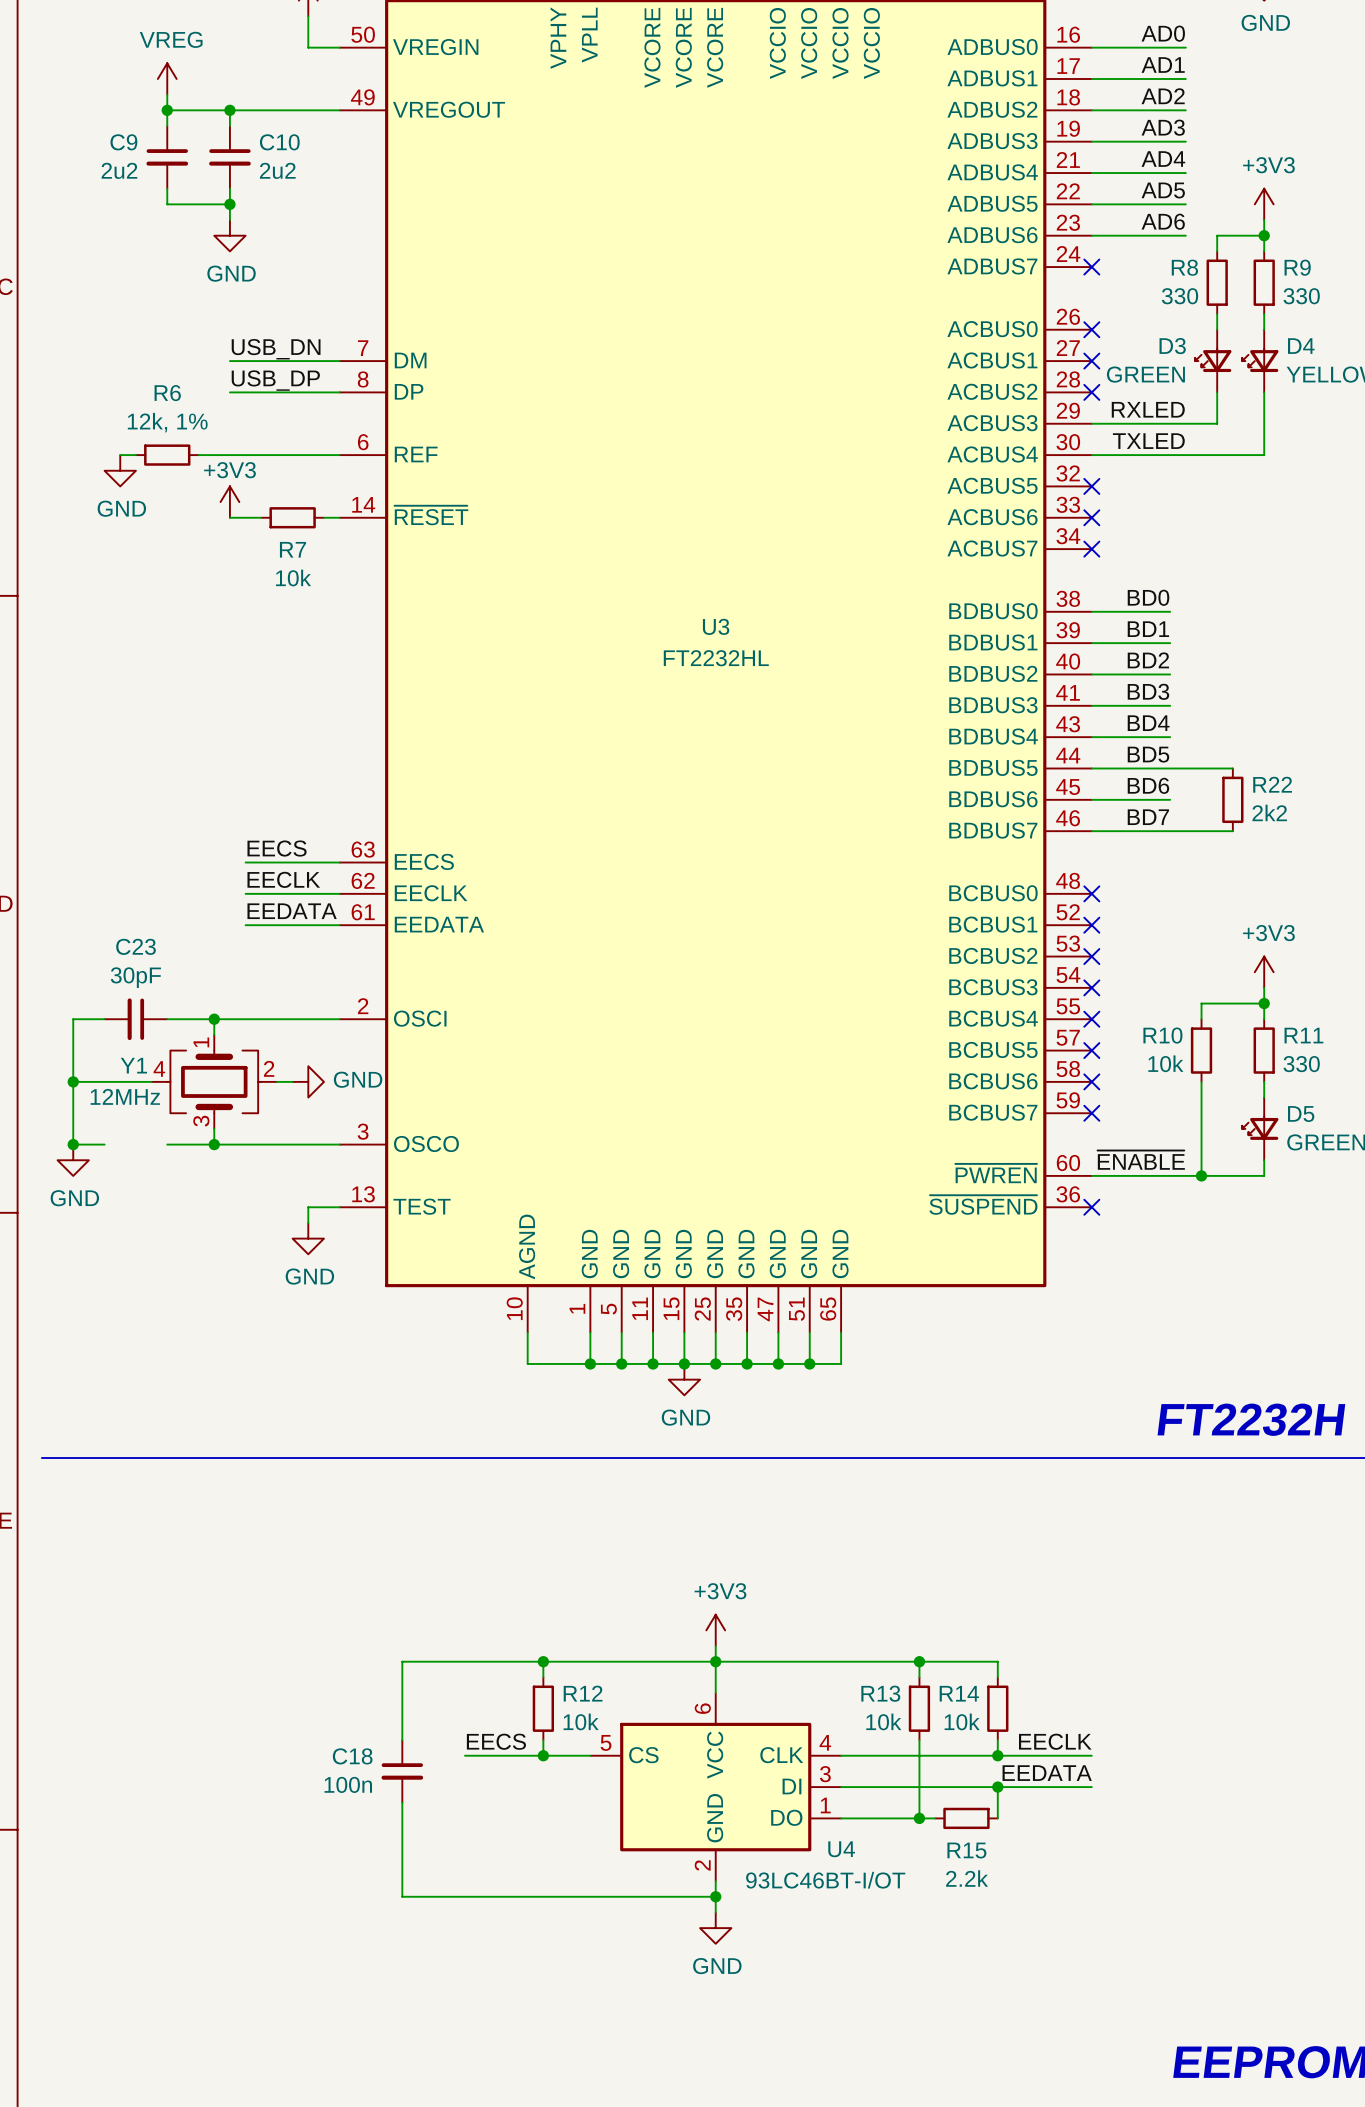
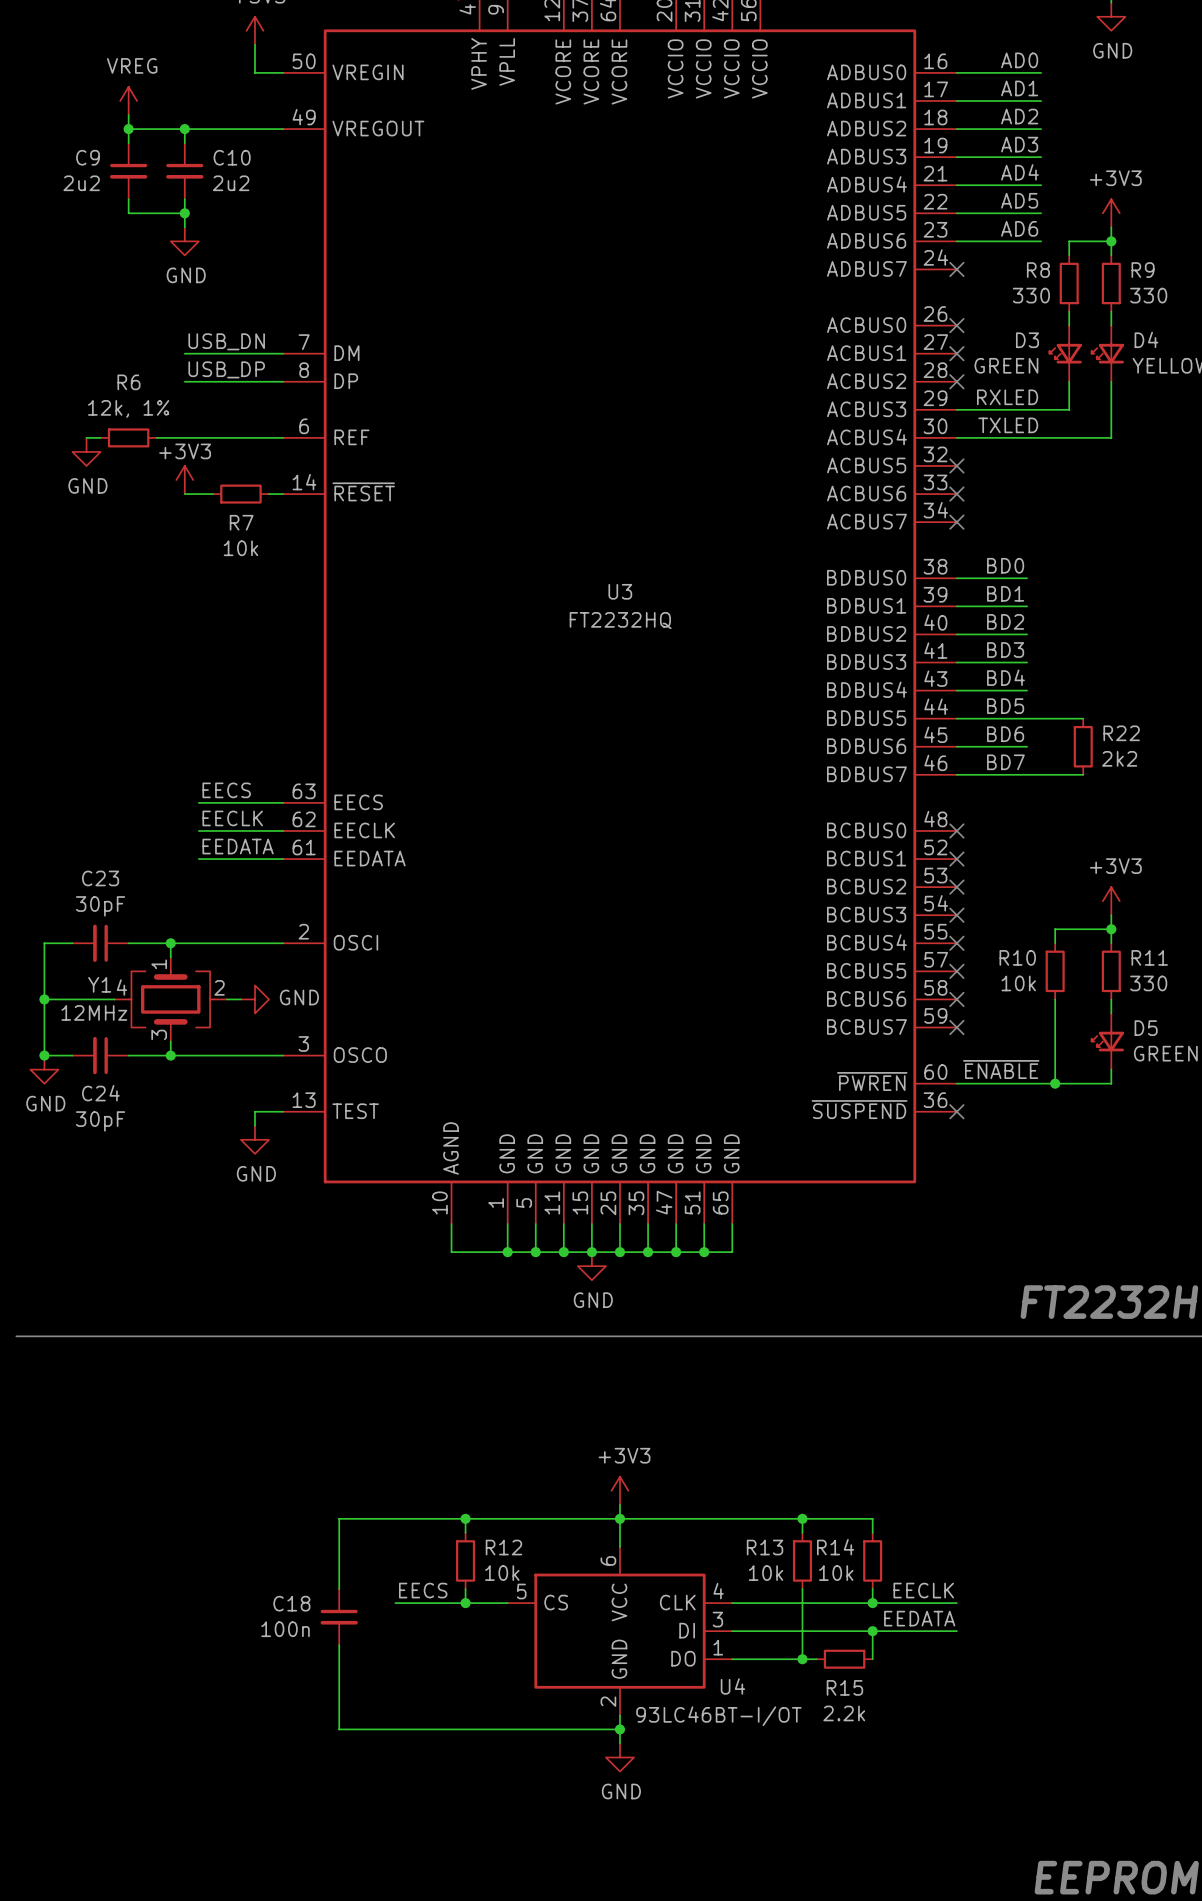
U3 value: FT2232HL (716, 658) -> FT2232HQ (620, 620)
C24: none -> 30pF (100, 1055)

